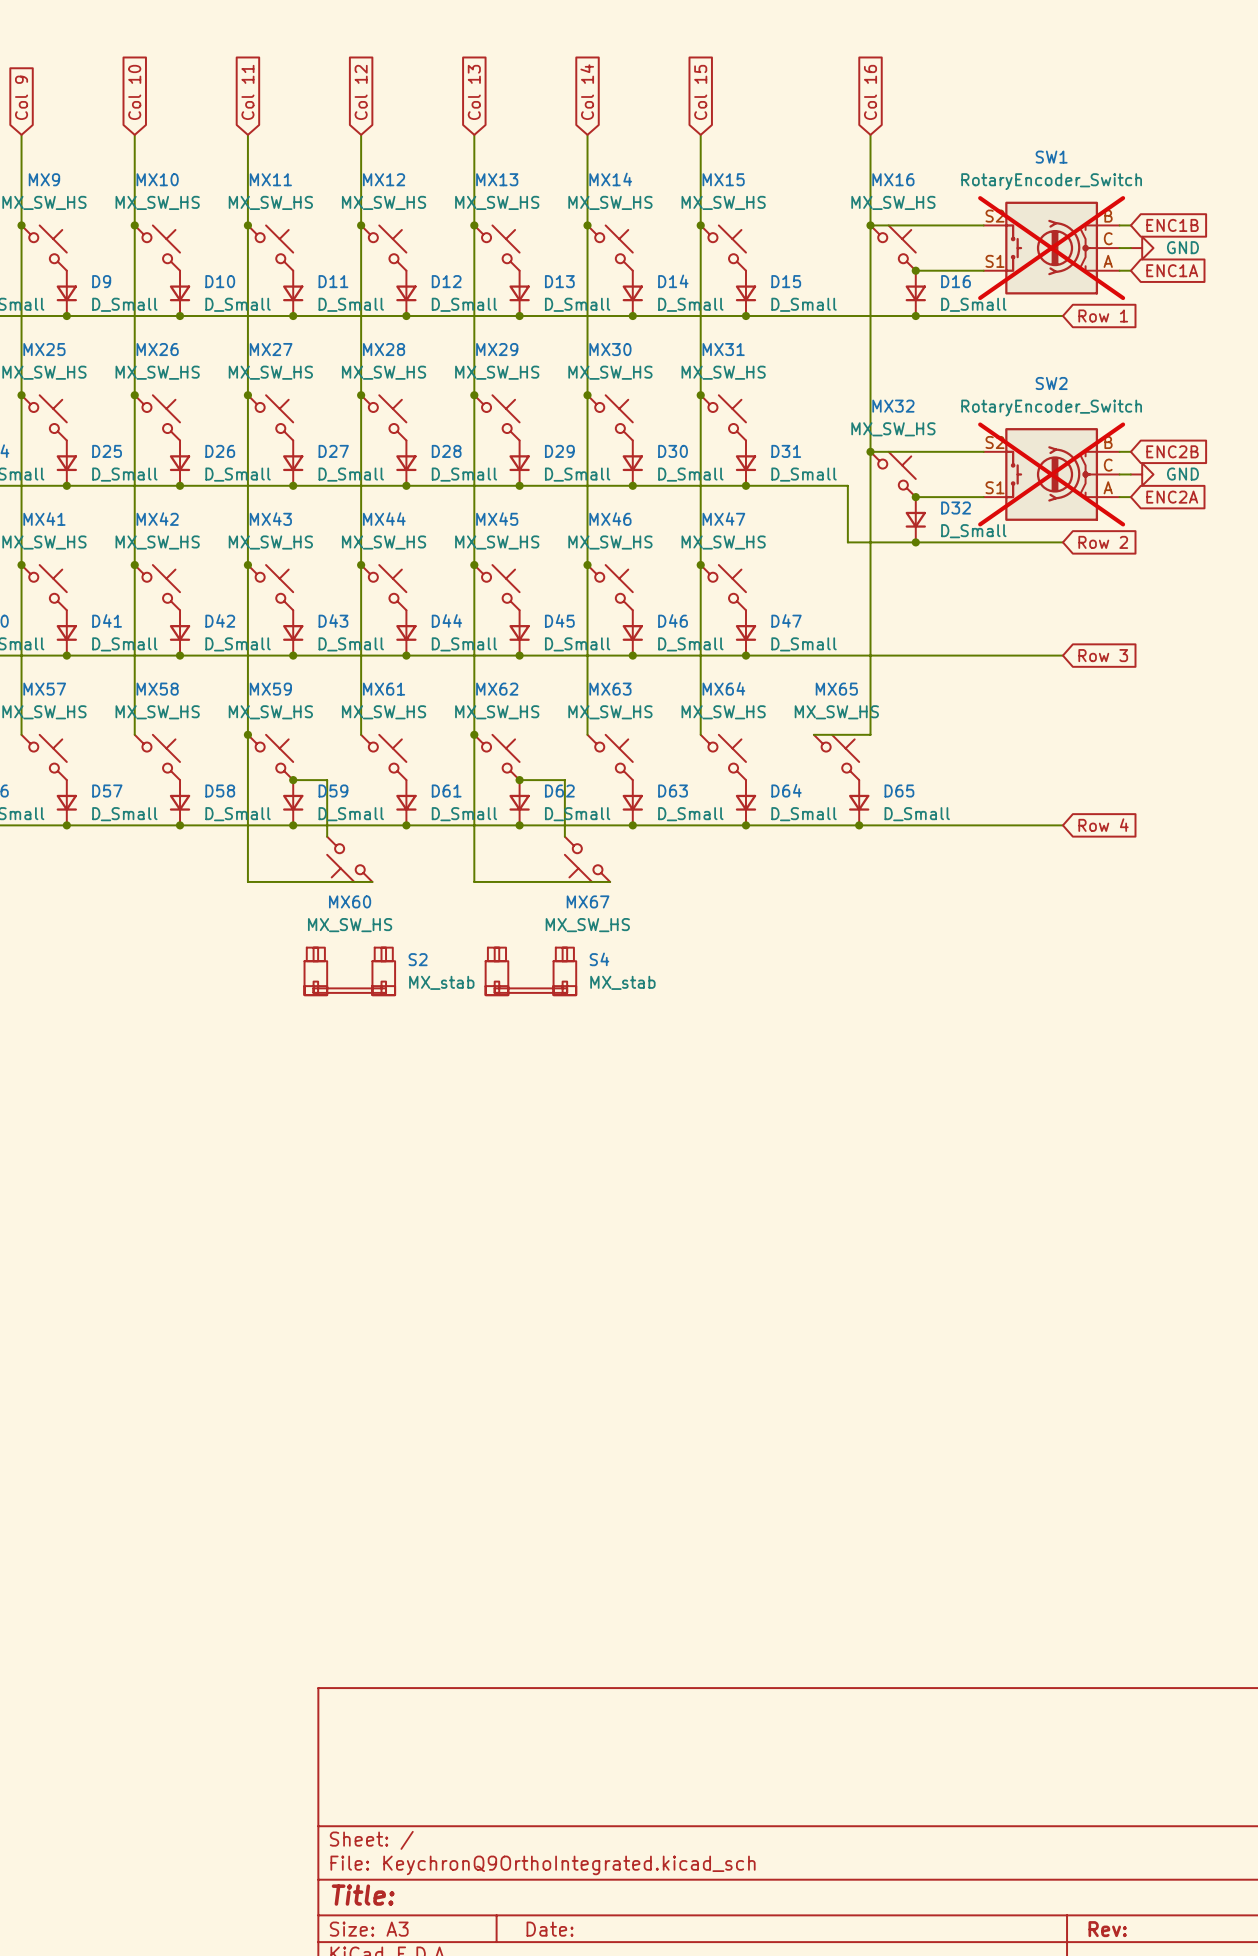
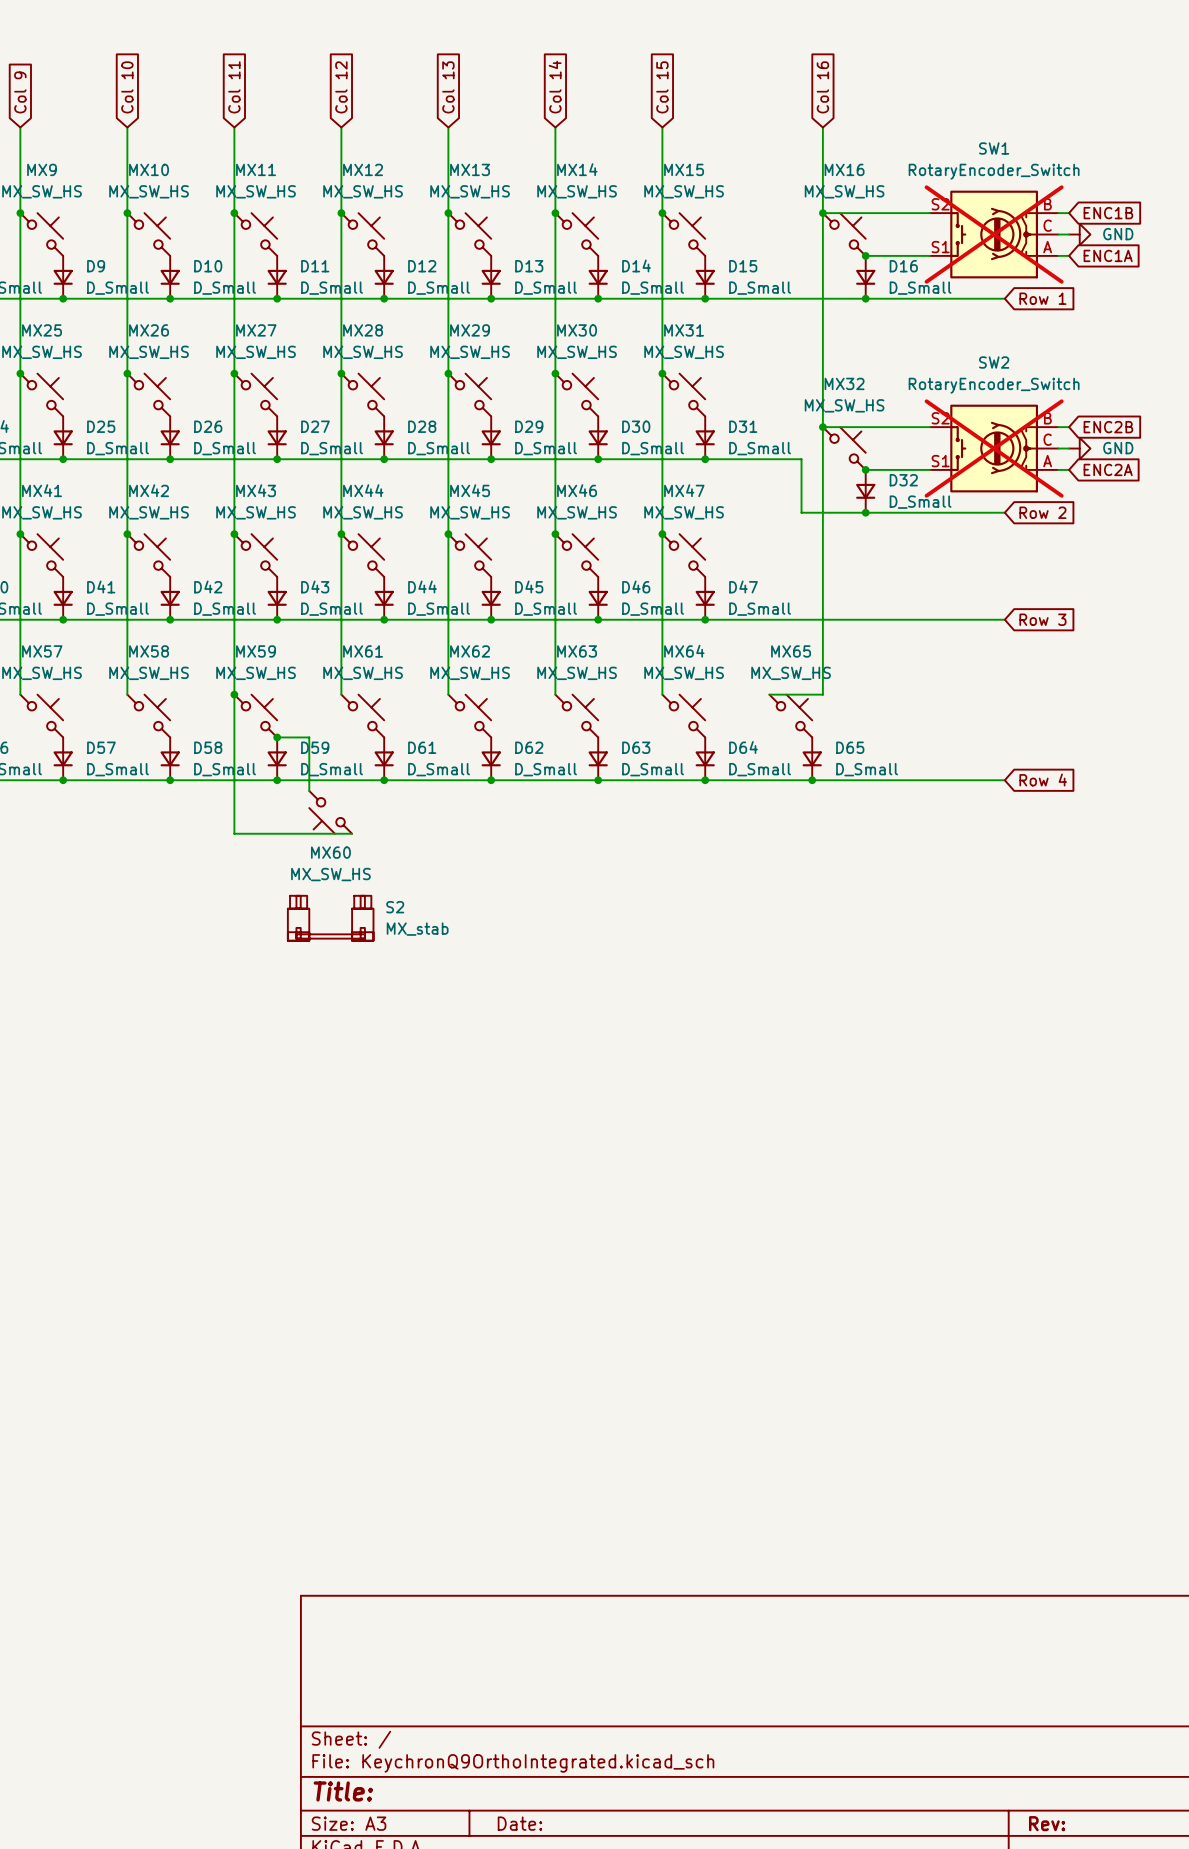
wire: (474, 734) (474, 881) (610, 881) -> none
junction: (474, 734) -> none
wire: (519, 780) (564, 780) (564, 836) -> none
junction: (519, 780) -> none
MX67: MX_SW_HS (587, 859) -> none
S4: MX_stab (530, 971) -> none

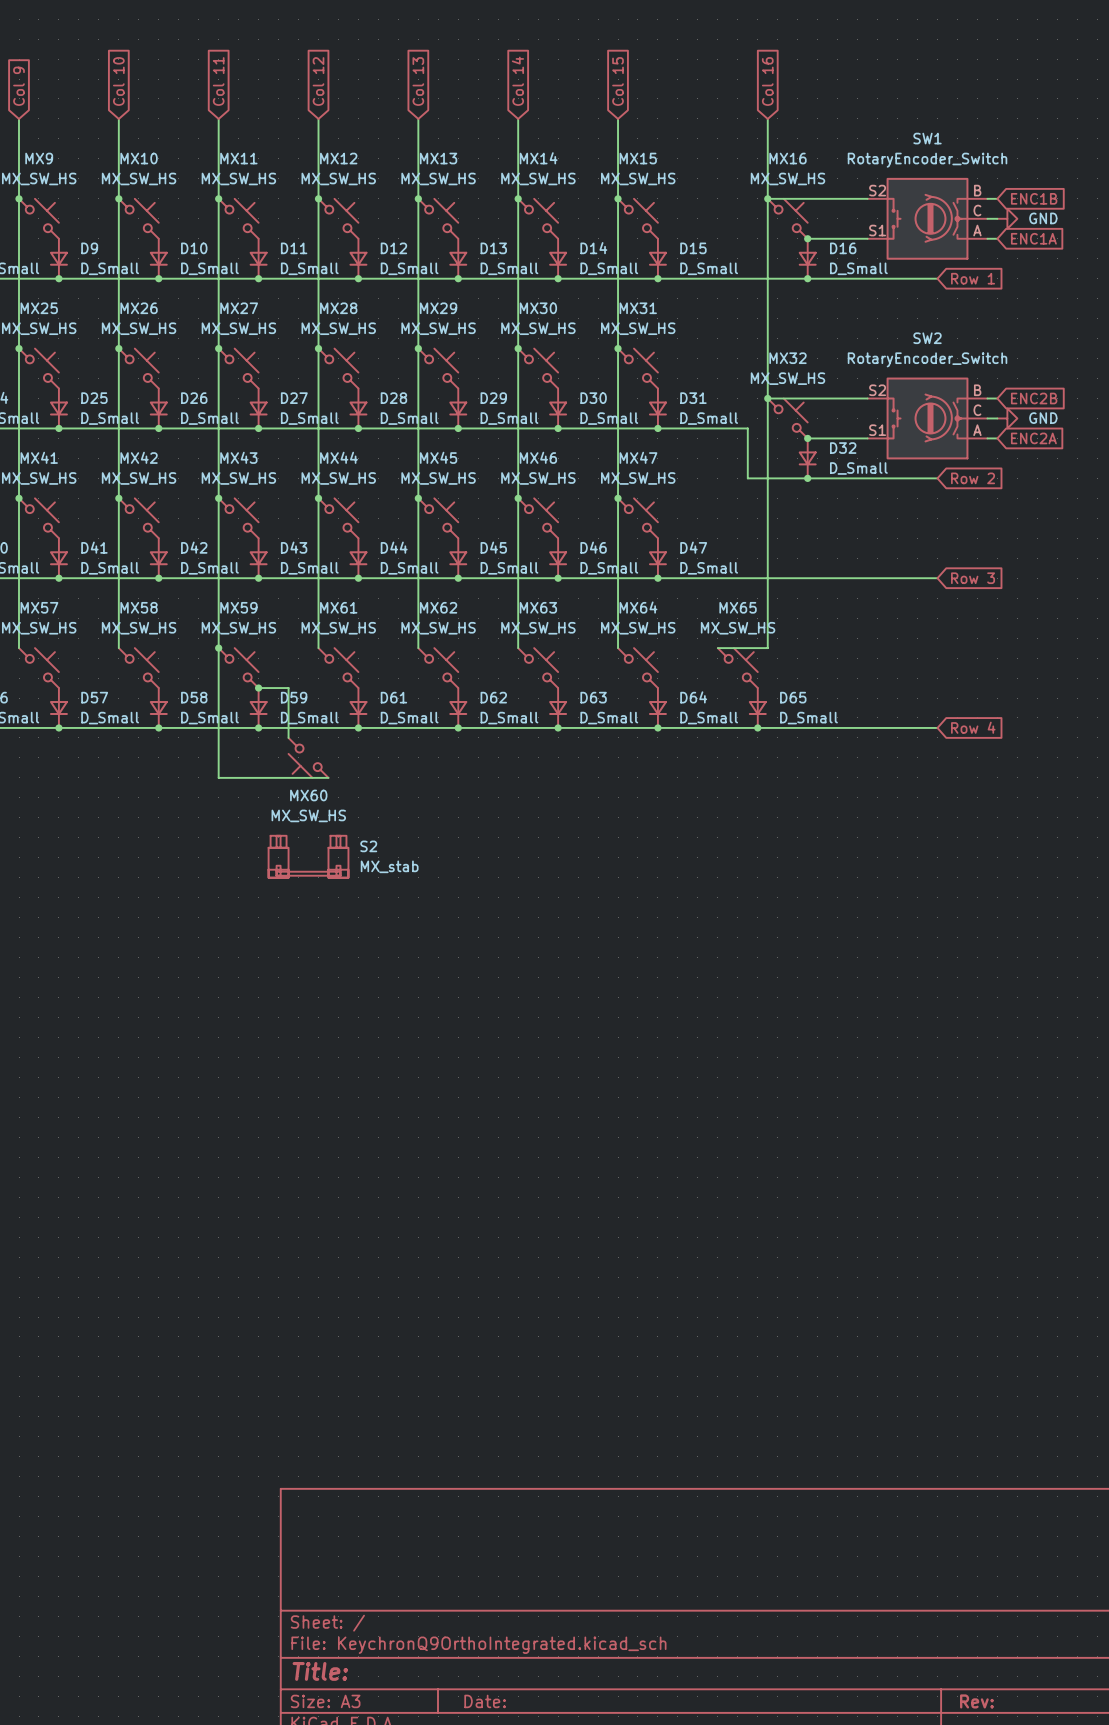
SW1 do-not-place cross: (994, 234) -> none
SW2 do-not-place cross: (994, 448) -> none

